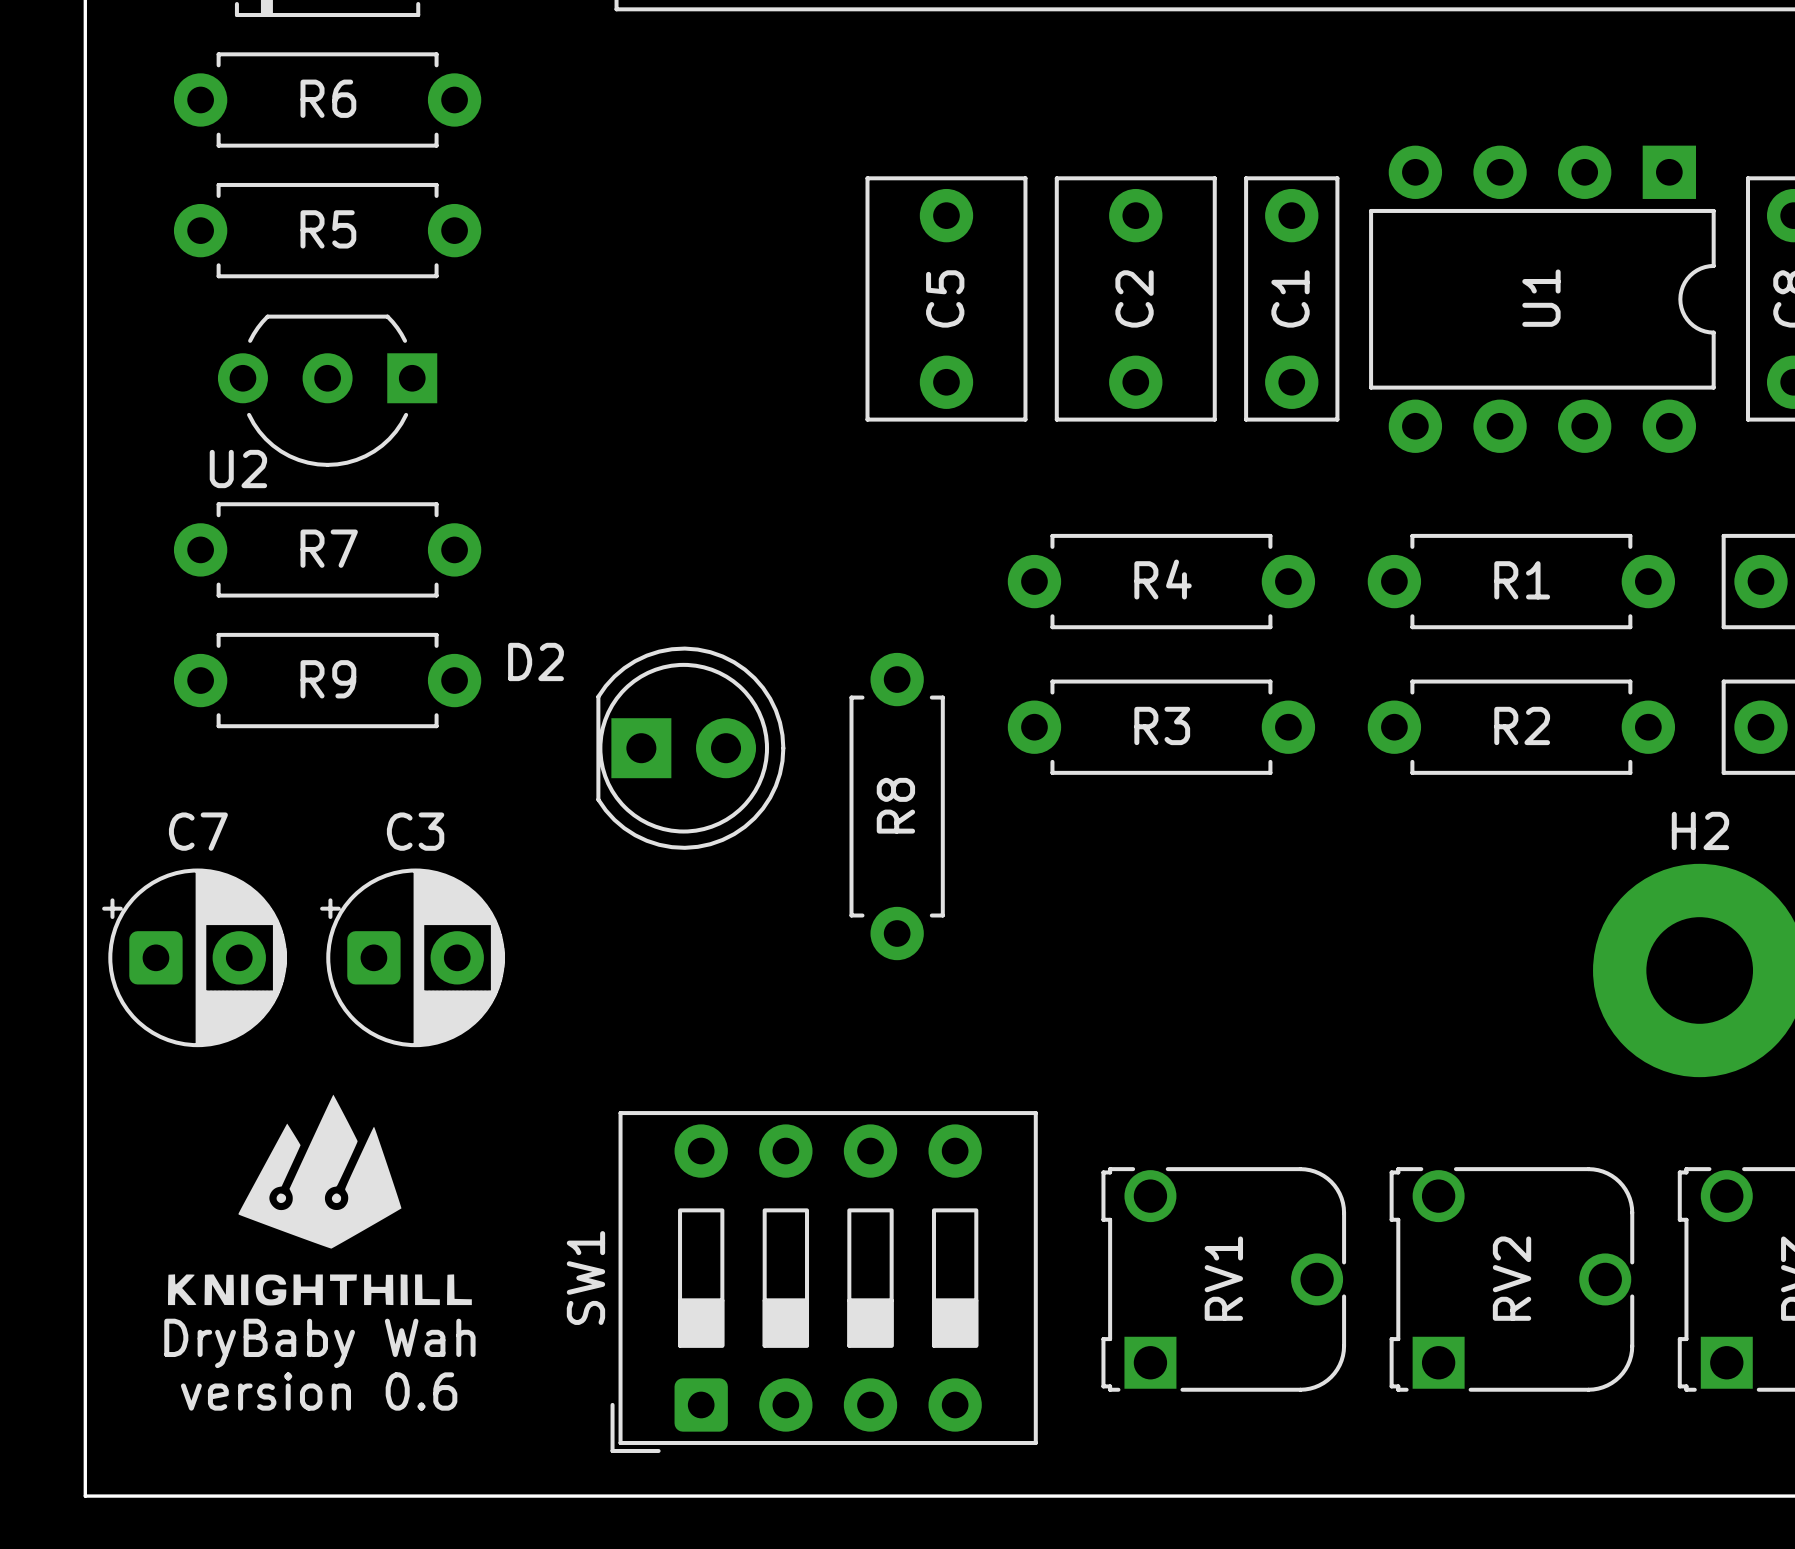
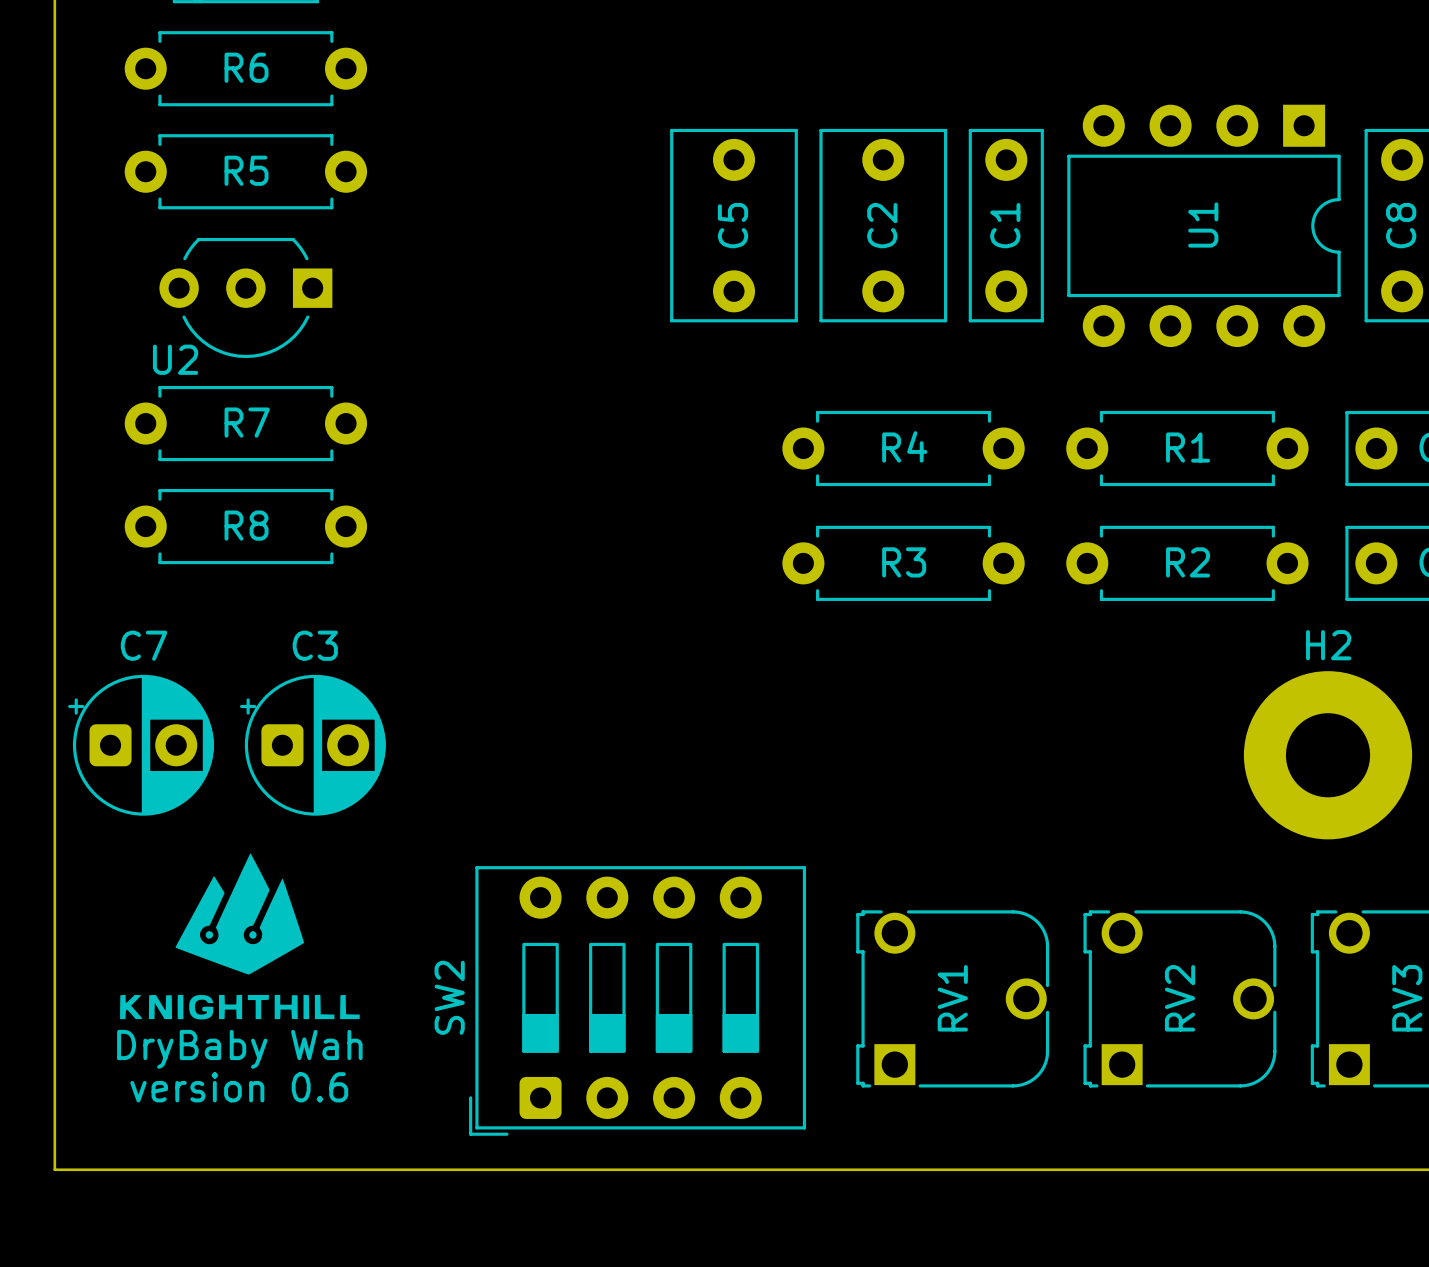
R9 name: R9 (328, 679) -> R8 (246, 525)
D2: (690, 748) -> none
R8: (897, 806) -> none
SW1 name: SW1 (585, 1278) -> SW2 (449, 997)

